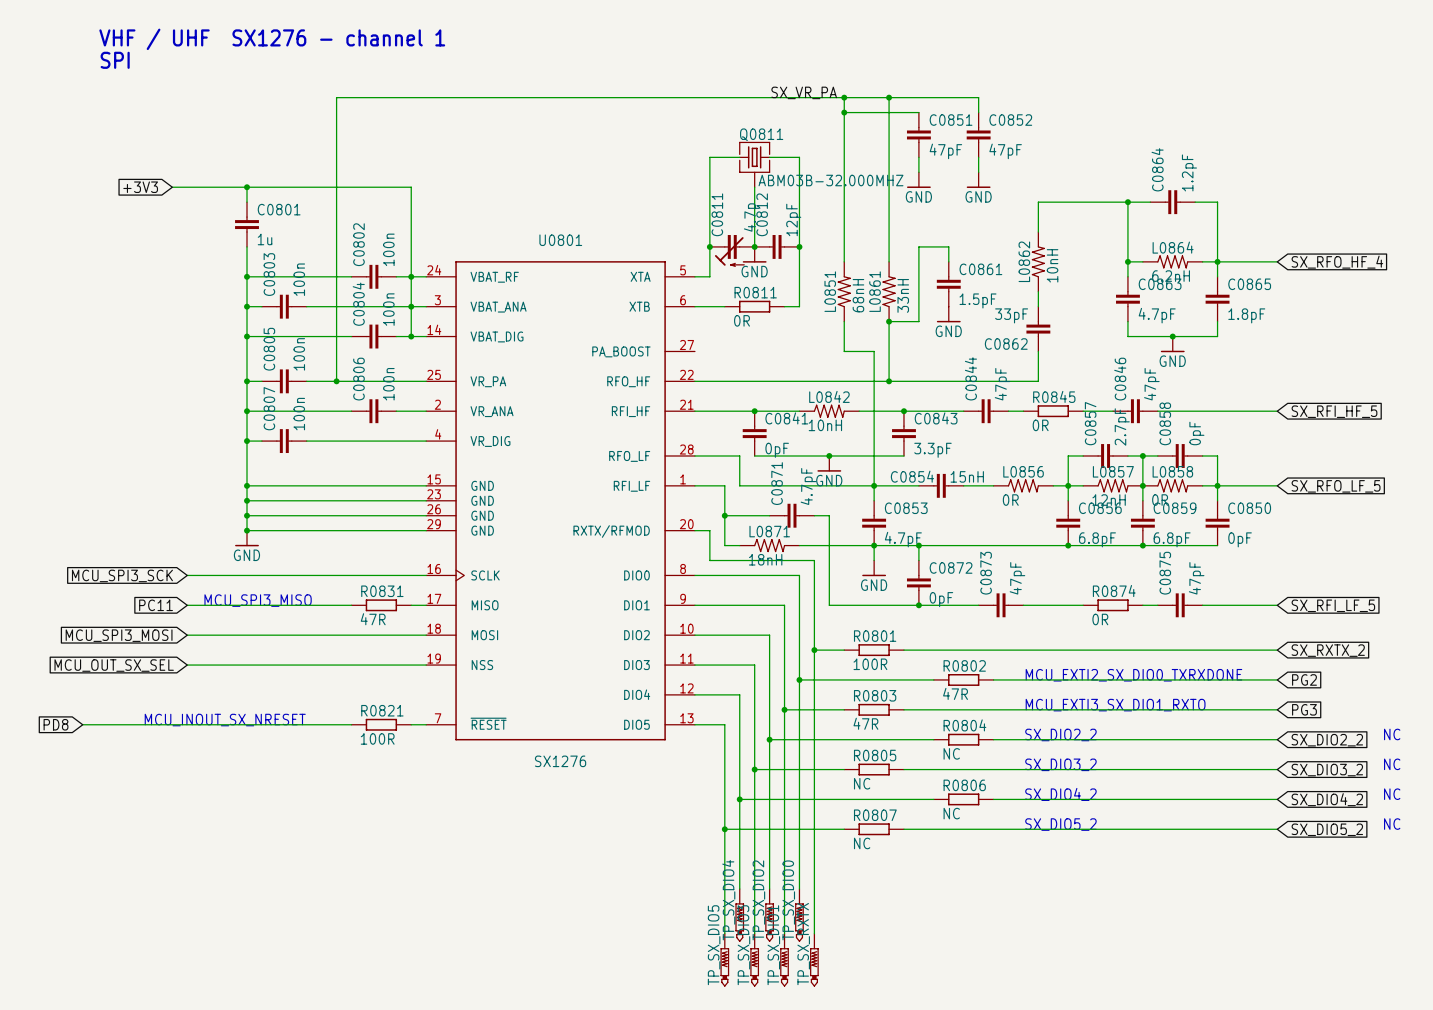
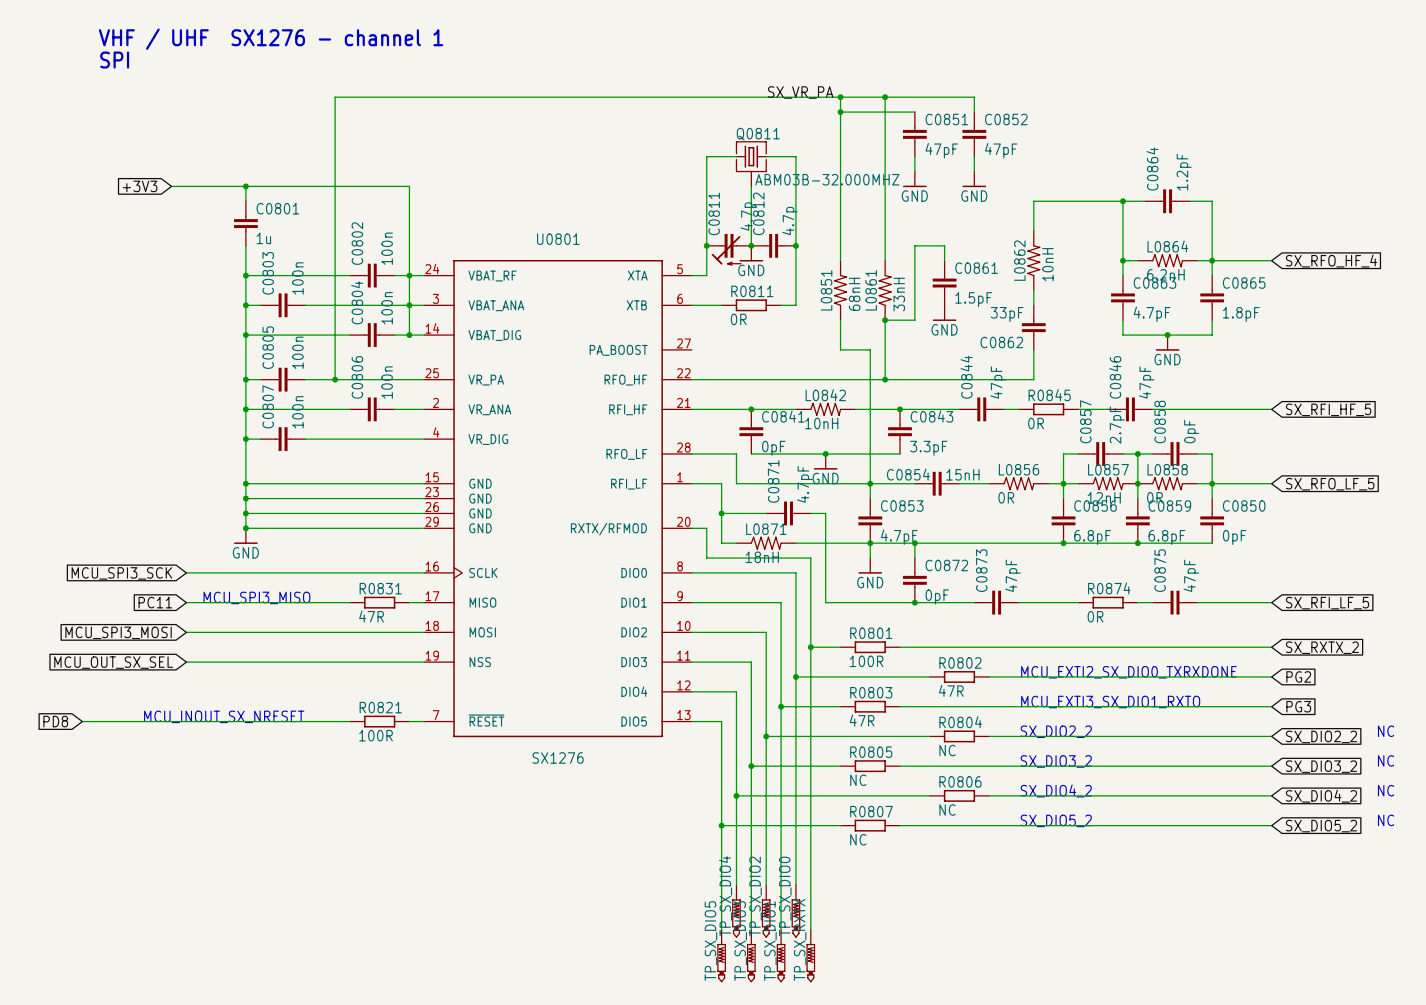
C0812 value: 12pF (793, 219) -> 4.7p (789, 221)

